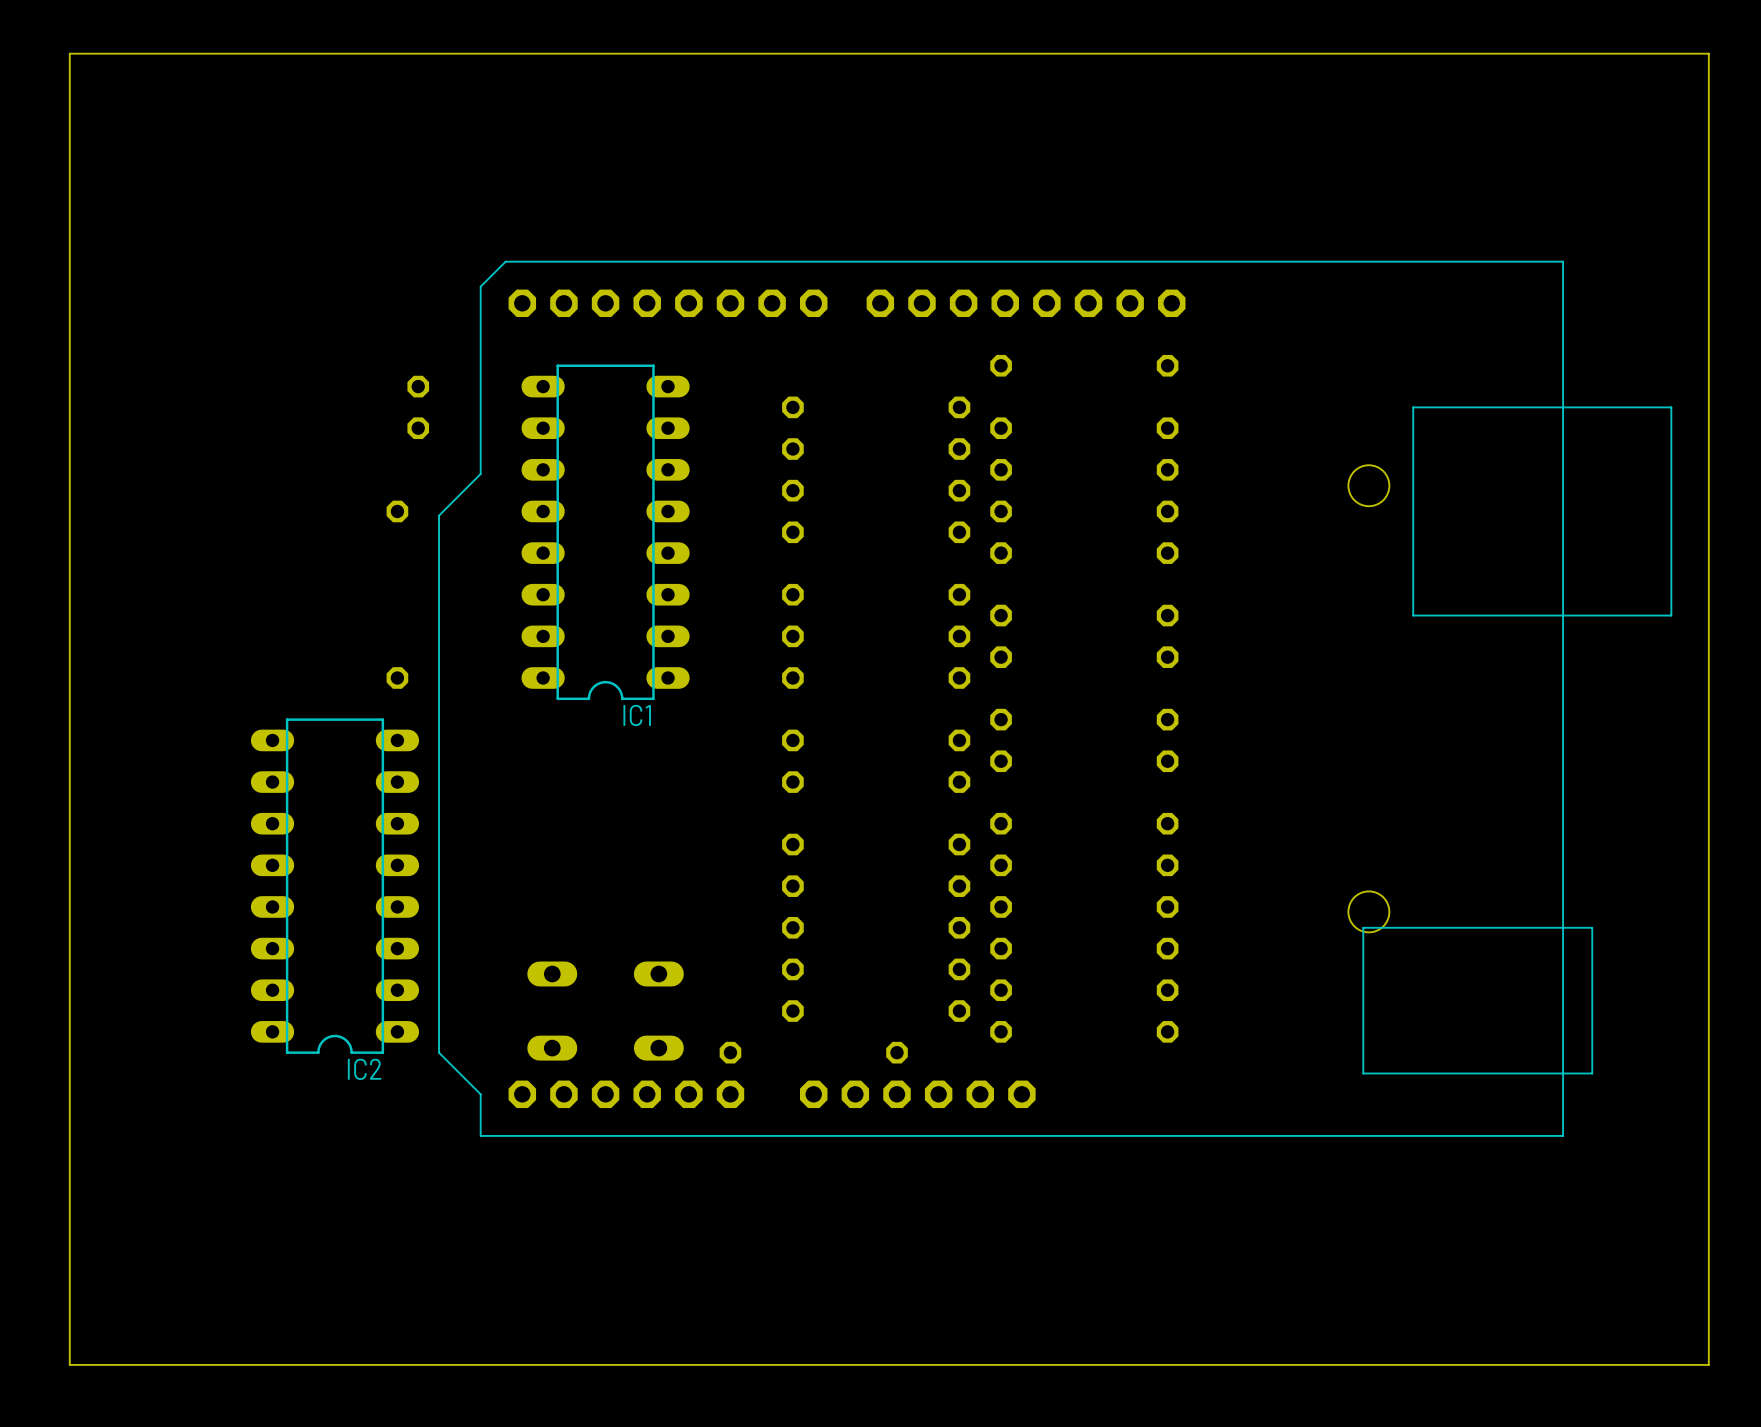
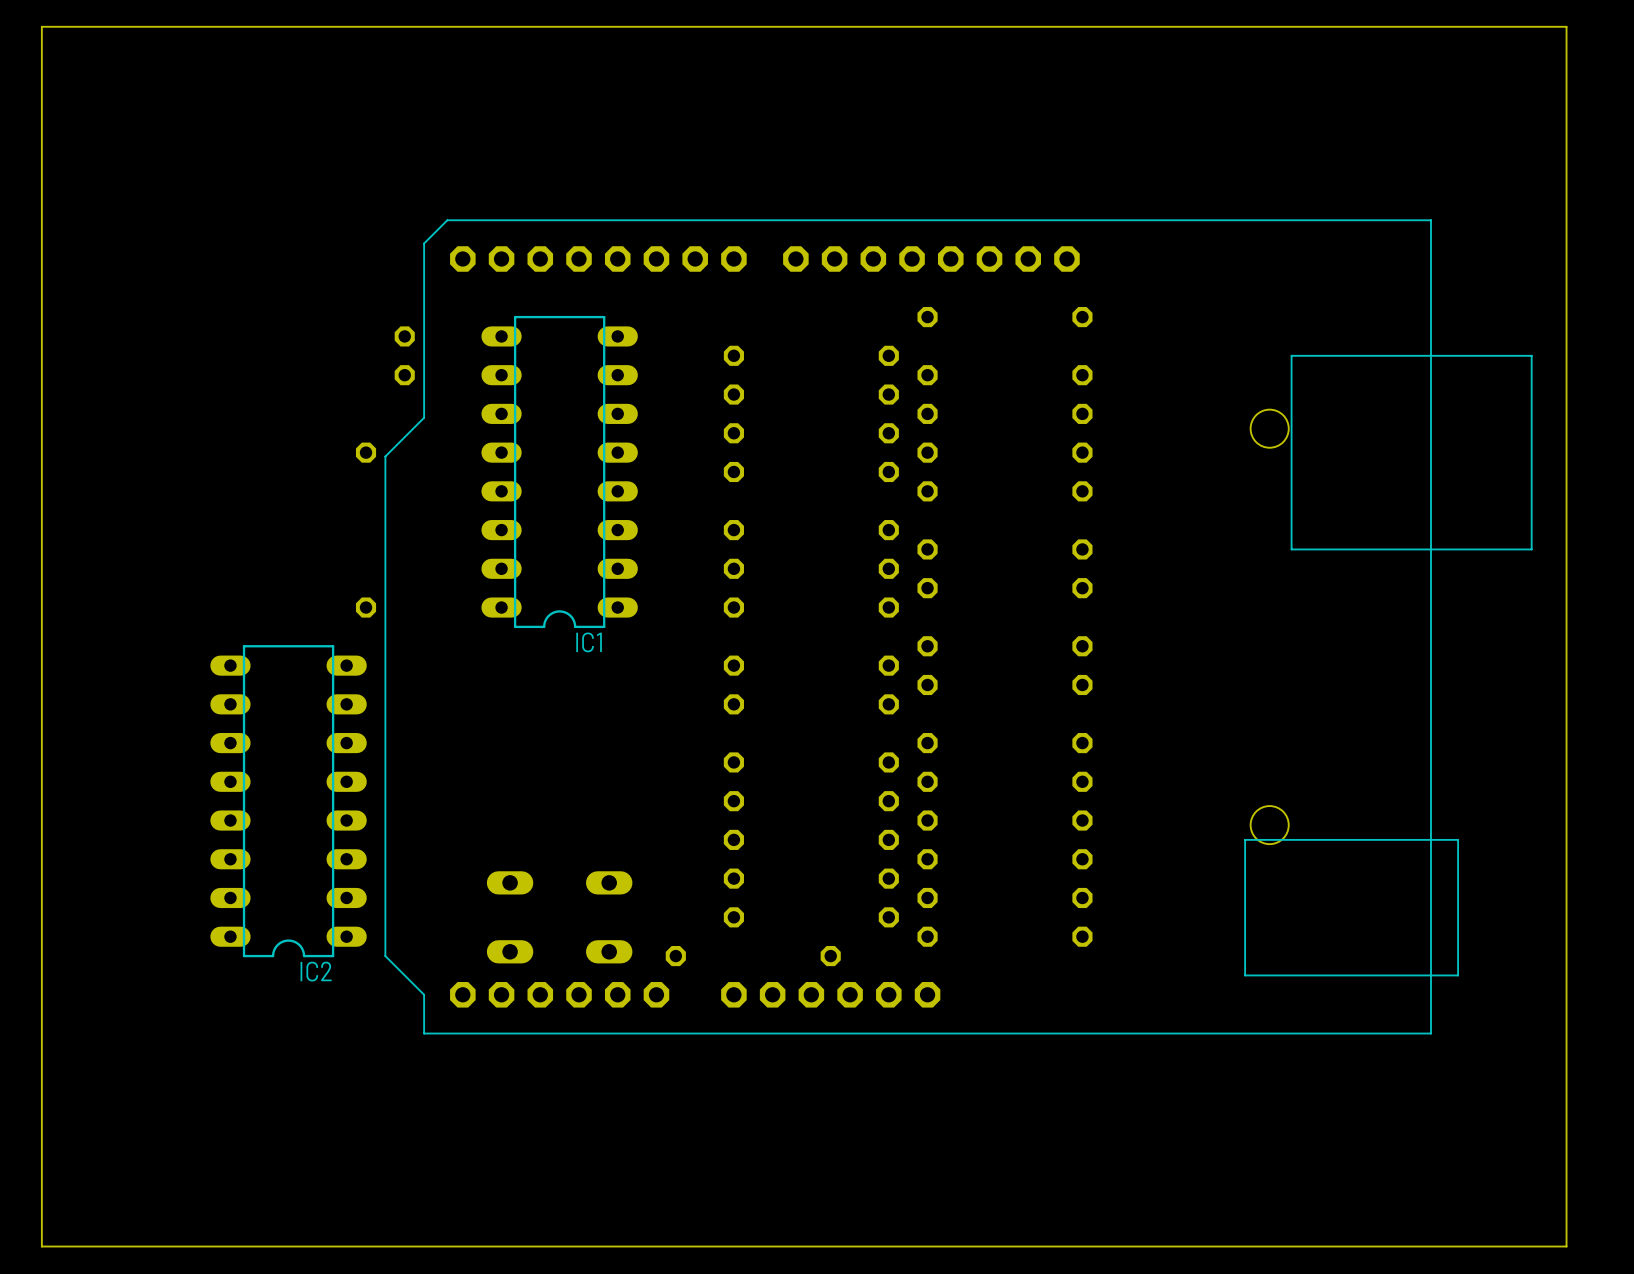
board edge: (69, 53) (69, 1364) -> (61, 26) (41, 26) (41, 1246) (61, 1246)
board edge: (1687, 53) (1708, 53) (1708, 1364) (1687, 1364) -> (1566, 26) (1566, 1246)
part position: (418, 407) -> (404, 355)
part position: (1055, 698) -> (958, 626)
IC2 position: (334, 886) -> (288, 801)

